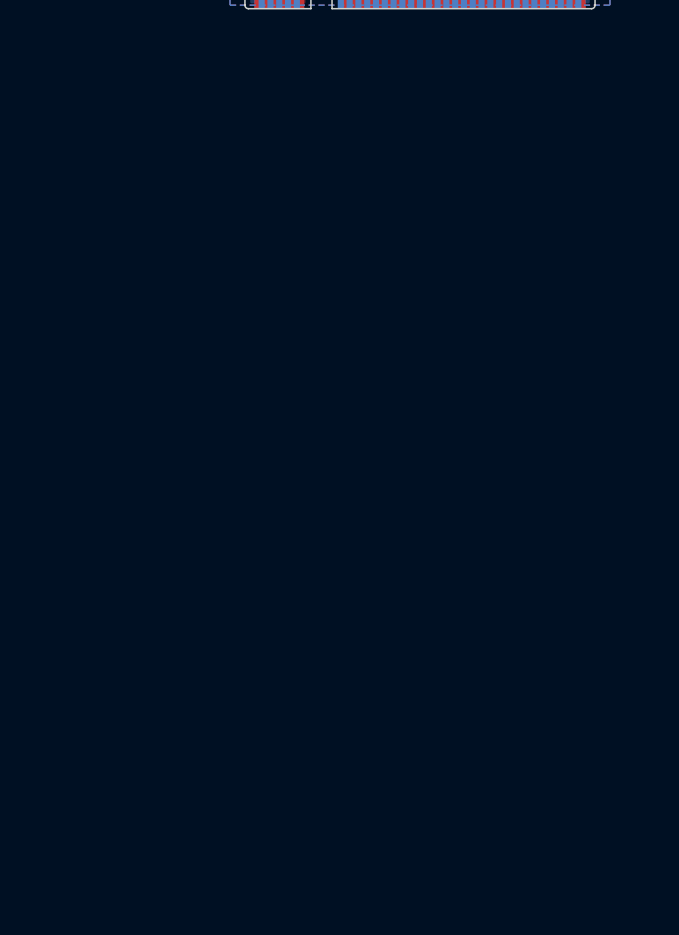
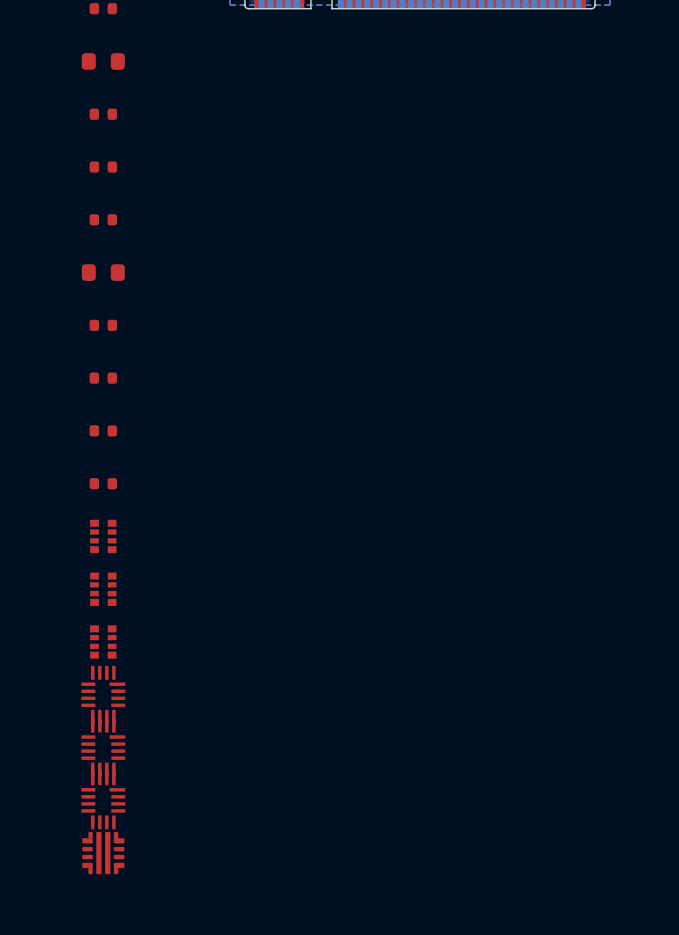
part: none -> (103, 8)
part: none -> (103, 61)
part: none -> (103, 114)
part: none -> (103, 167)
part: none -> (103, 219)
part: none -> (103, 272)
part: none -> (103, 325)
part: none -> (103, 378)
part: none -> (103, 430)
part: none -> (103, 483)
part: none -> (103, 536)
part: none -> (103, 589)
part: none -> (103, 642)
part: none -> (103, 694)
part: none -> (103, 747)
part: none -> (103, 800)
part: none -> (103, 853)

